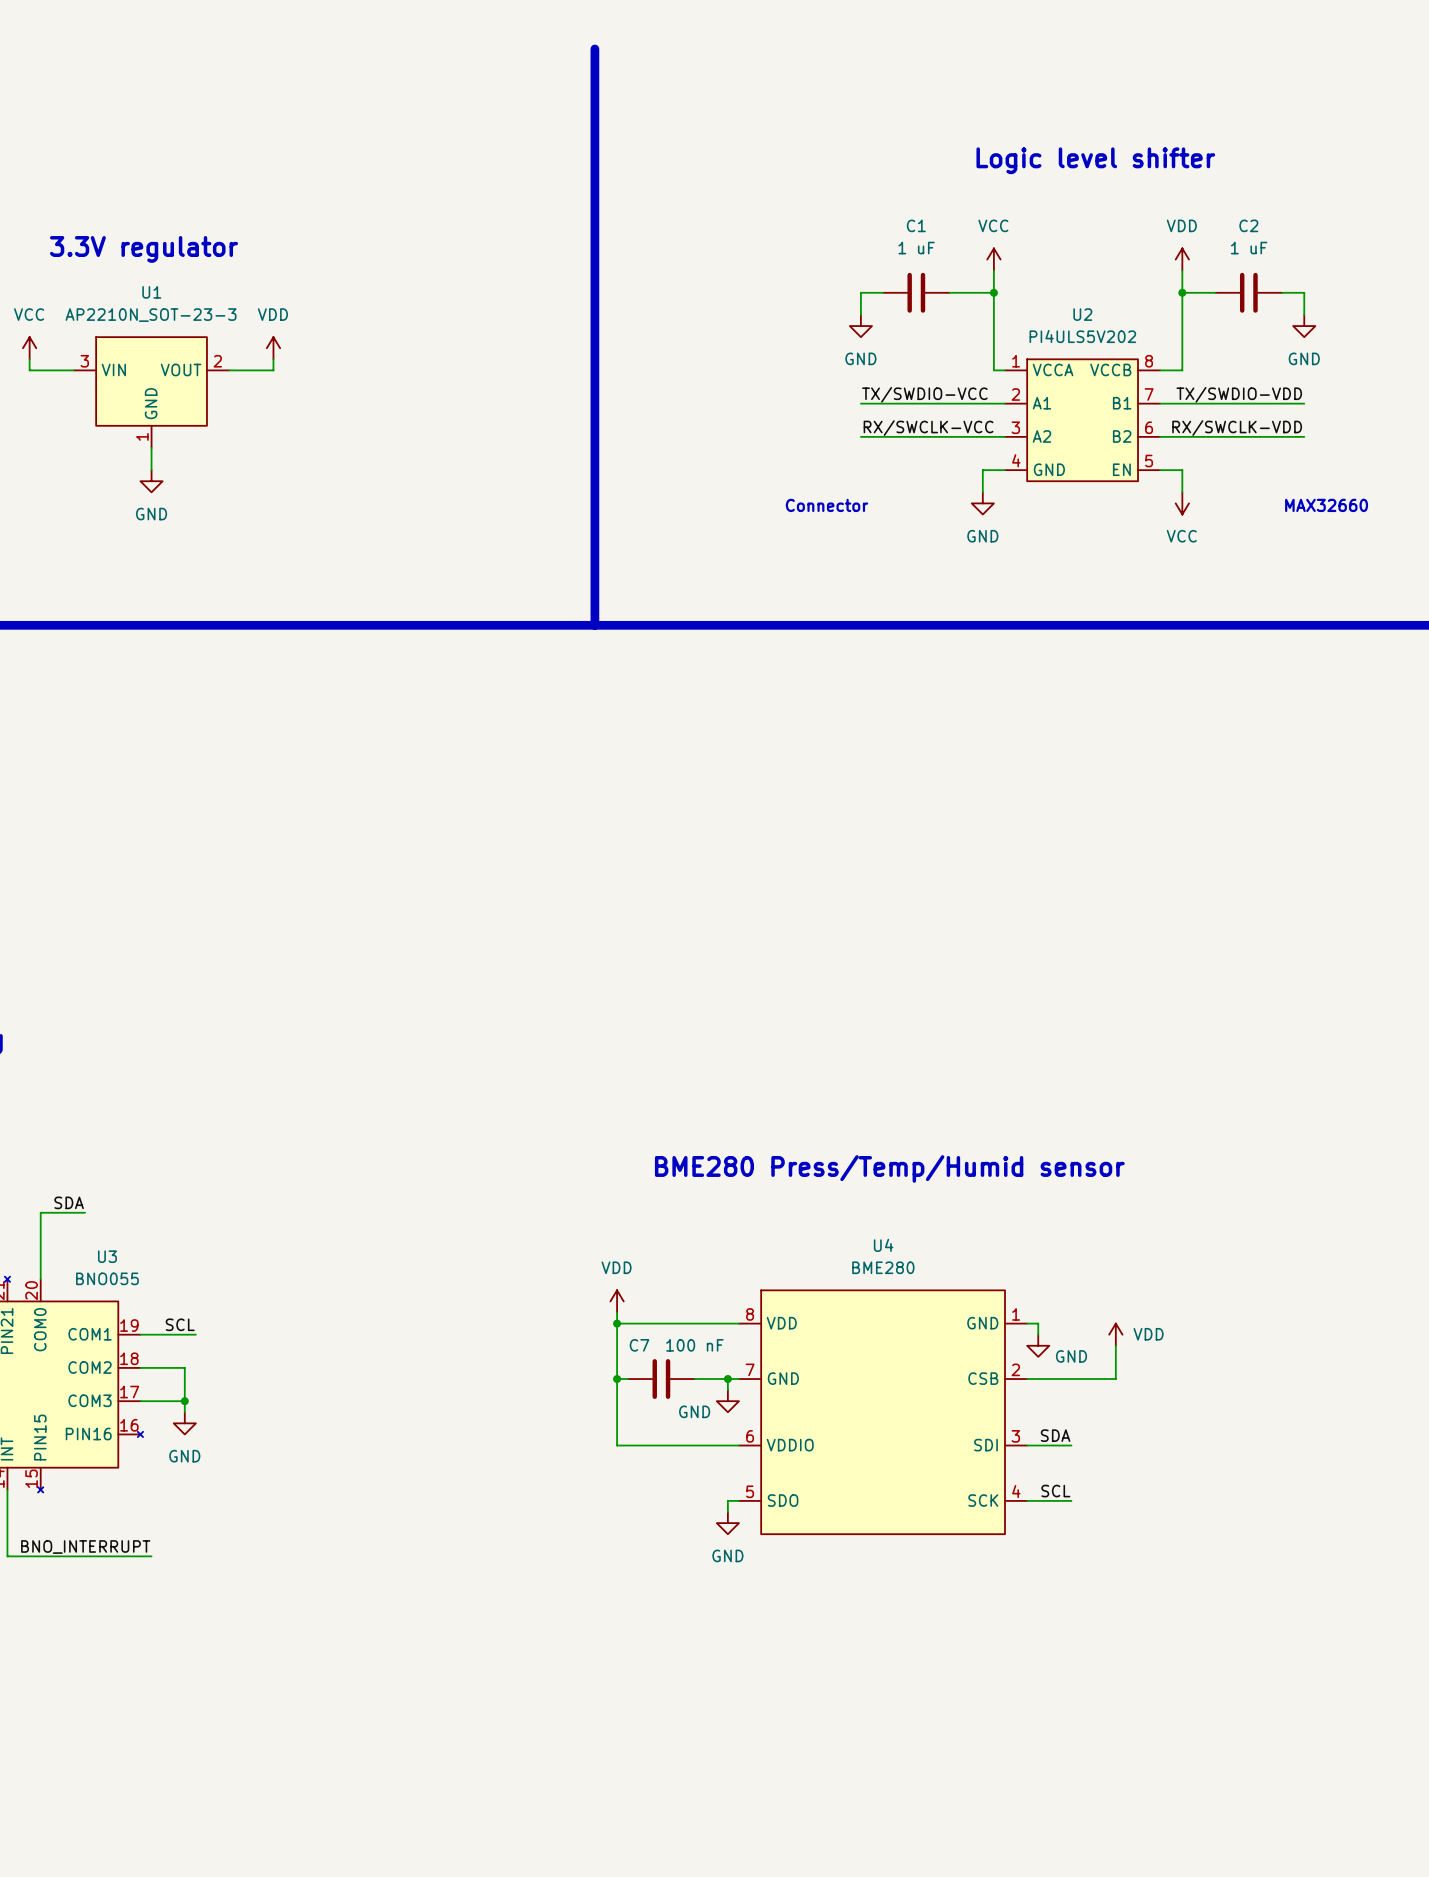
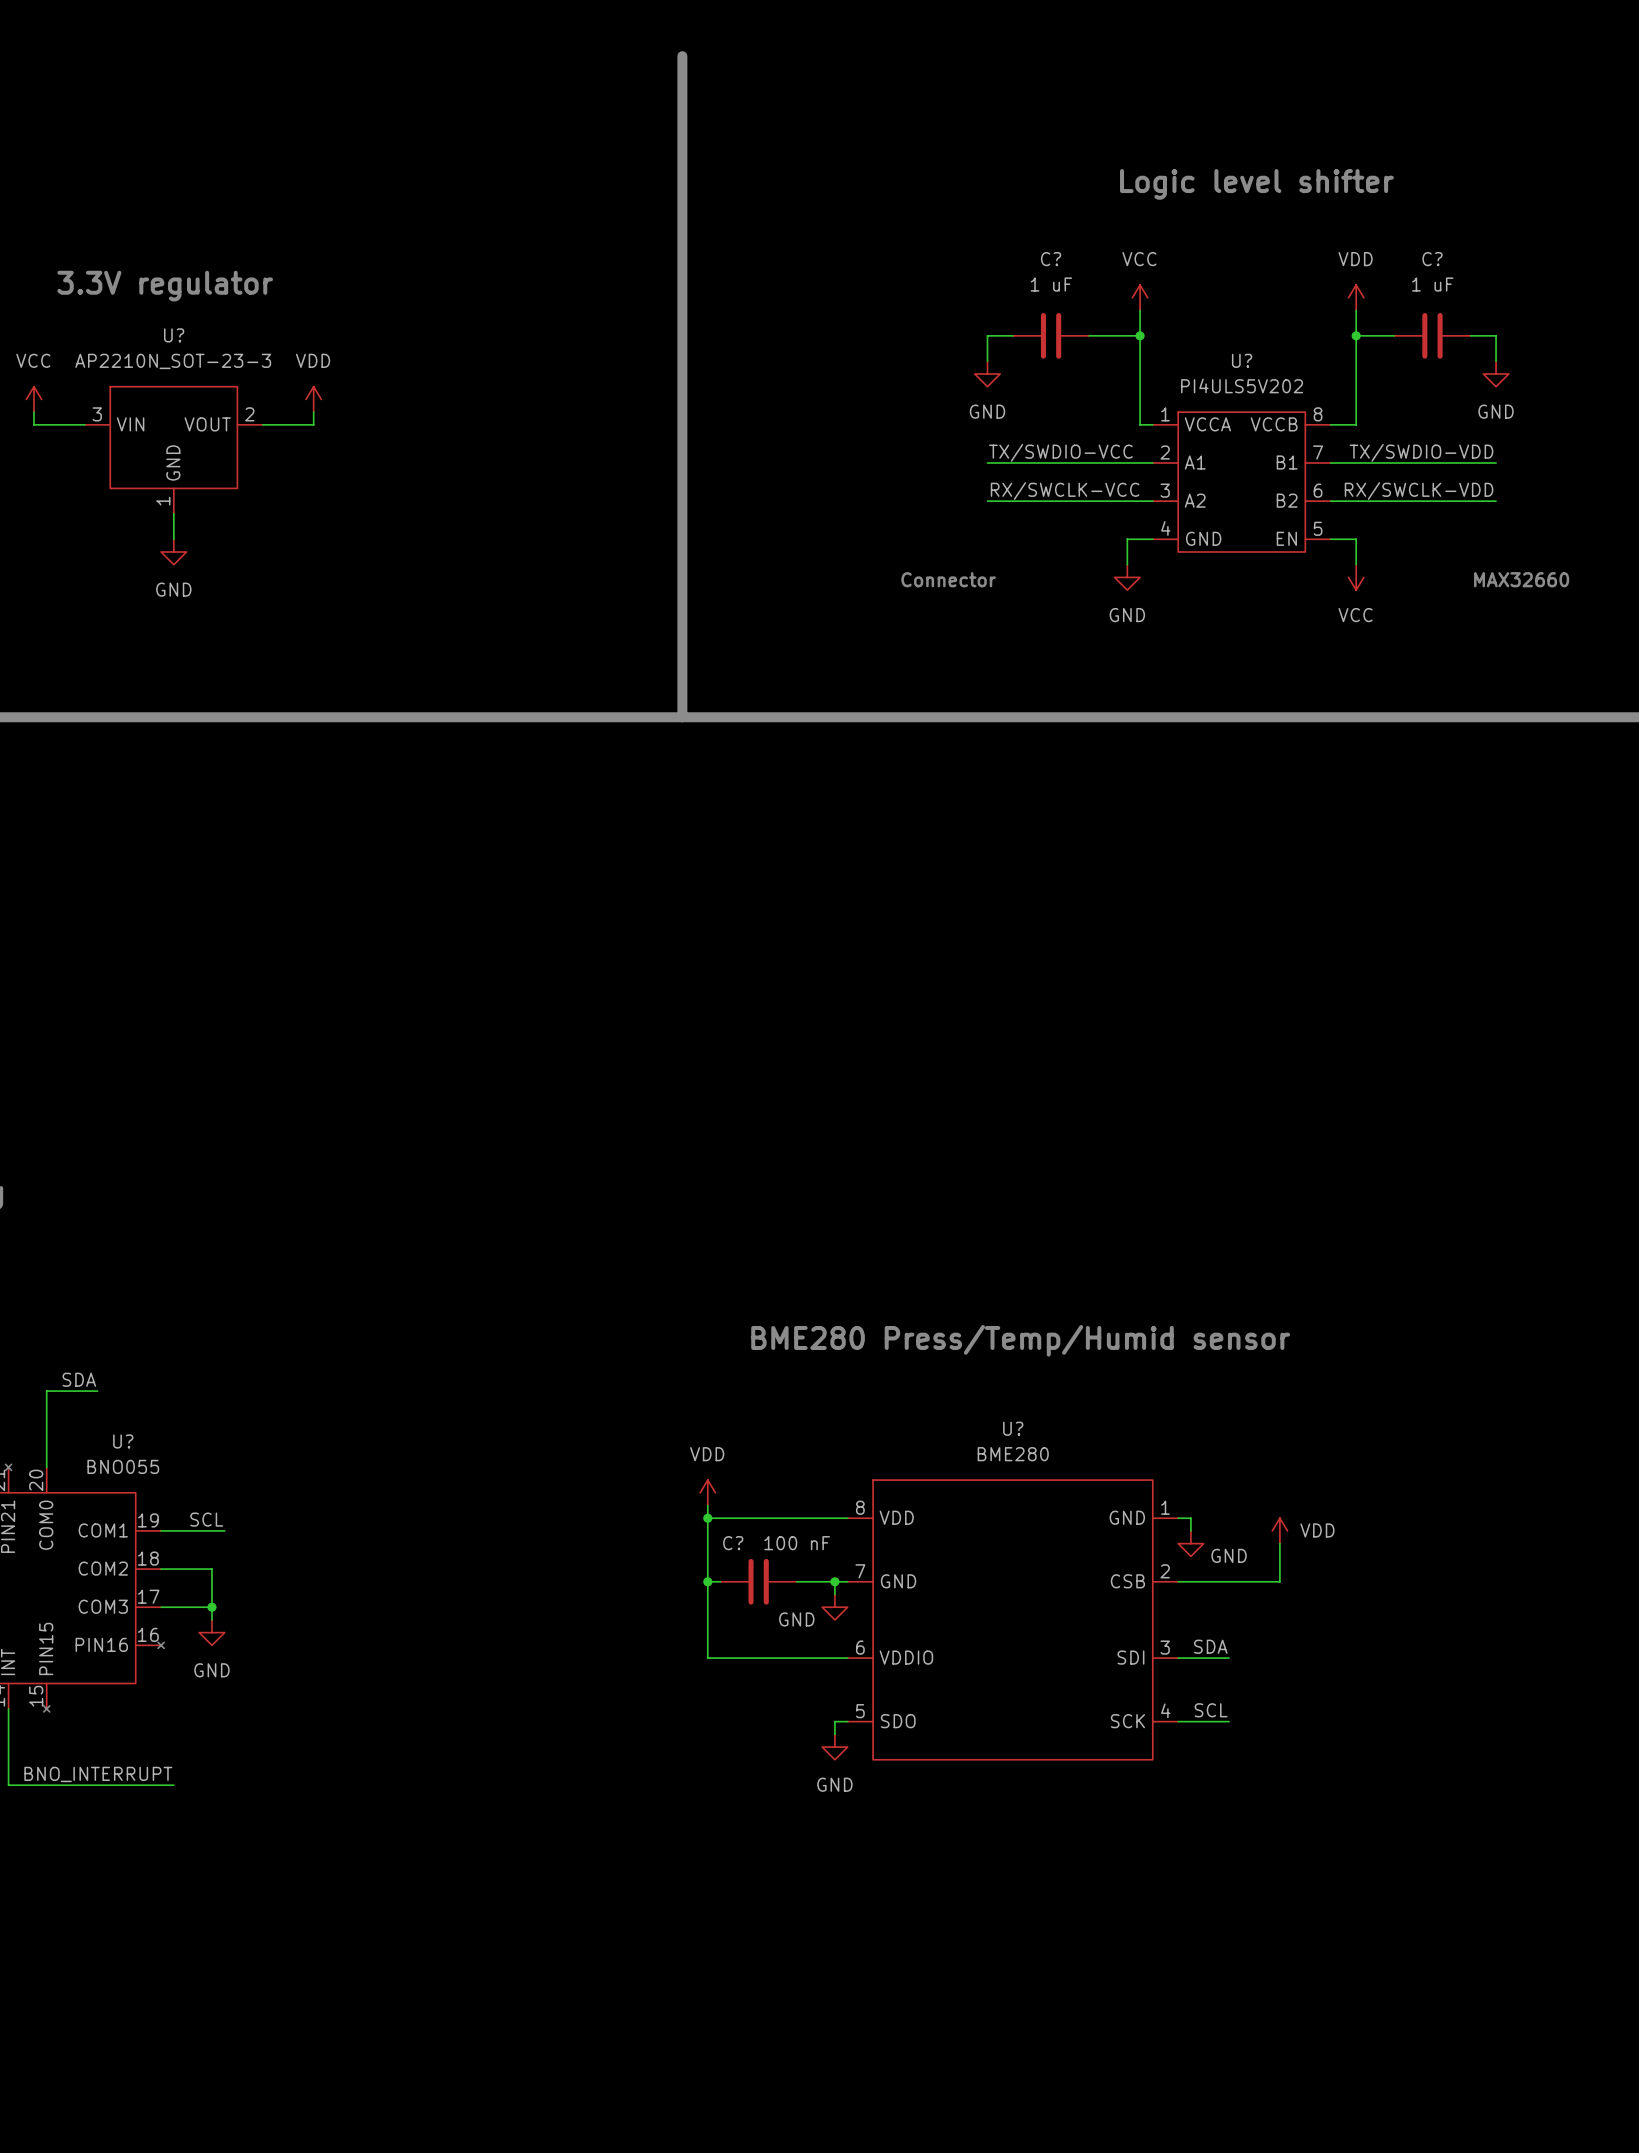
C1 name: C1 (916, 225) -> C? (1051, 259)
C2 name: C2 (1248, 225) -> C? (1432, 259)
U1 name: U1 (151, 292) -> U? (174, 335)
U2 name: U2 (1082, 314) -> U? (1242, 360)
U4 name: U4 (883, 1245) -> U? (1013, 1428)
U3 name: U3 (107, 1256) -> U? (123, 1441)
C7 name: C7 (639, 1345) -> C? (733, 1543)

